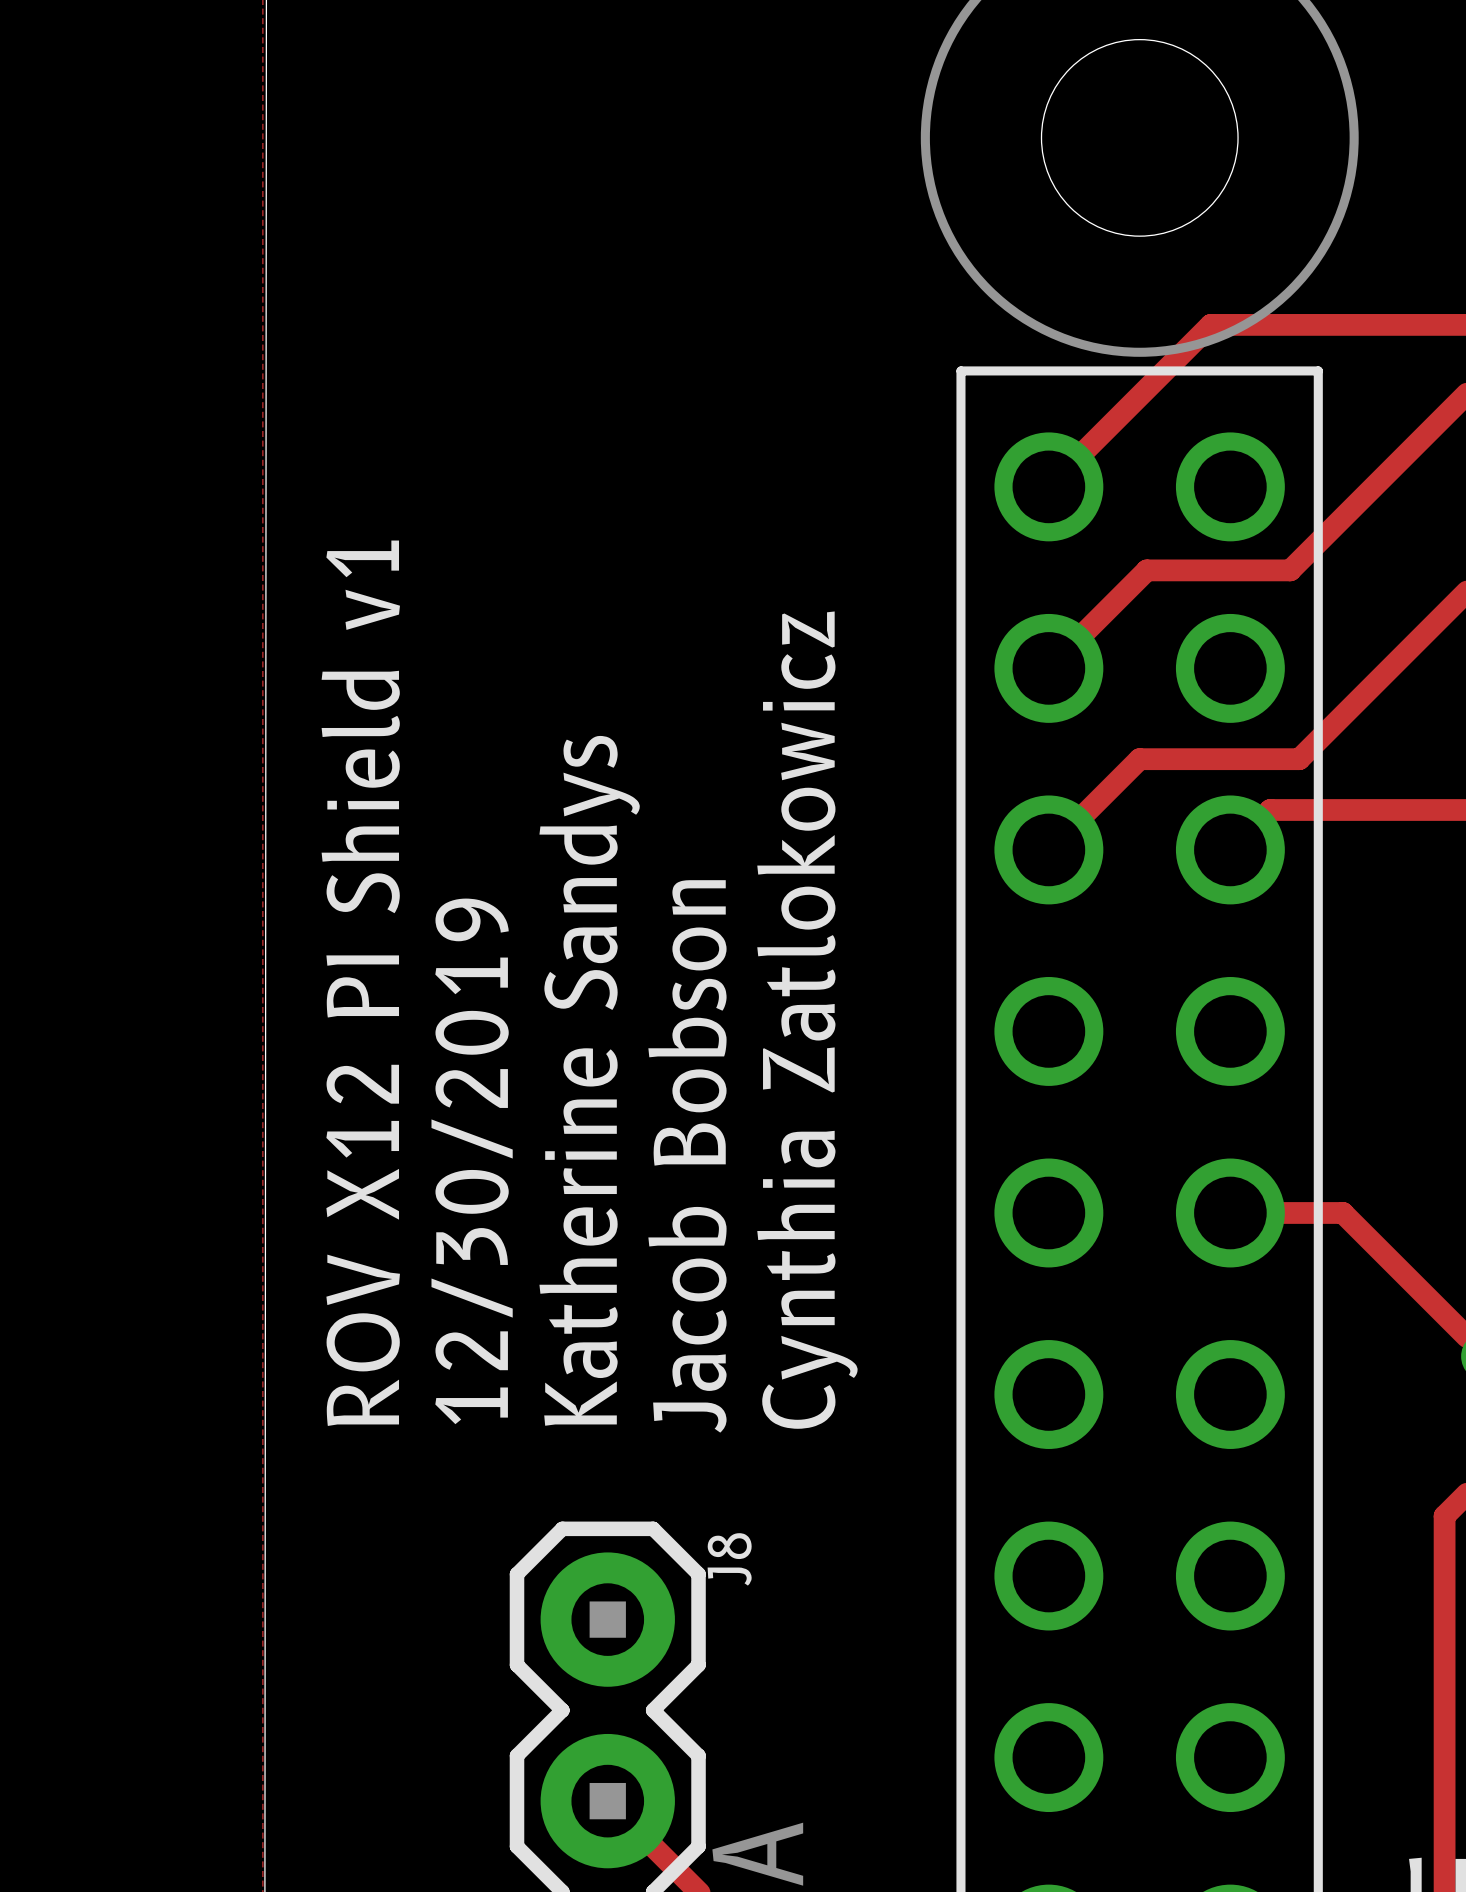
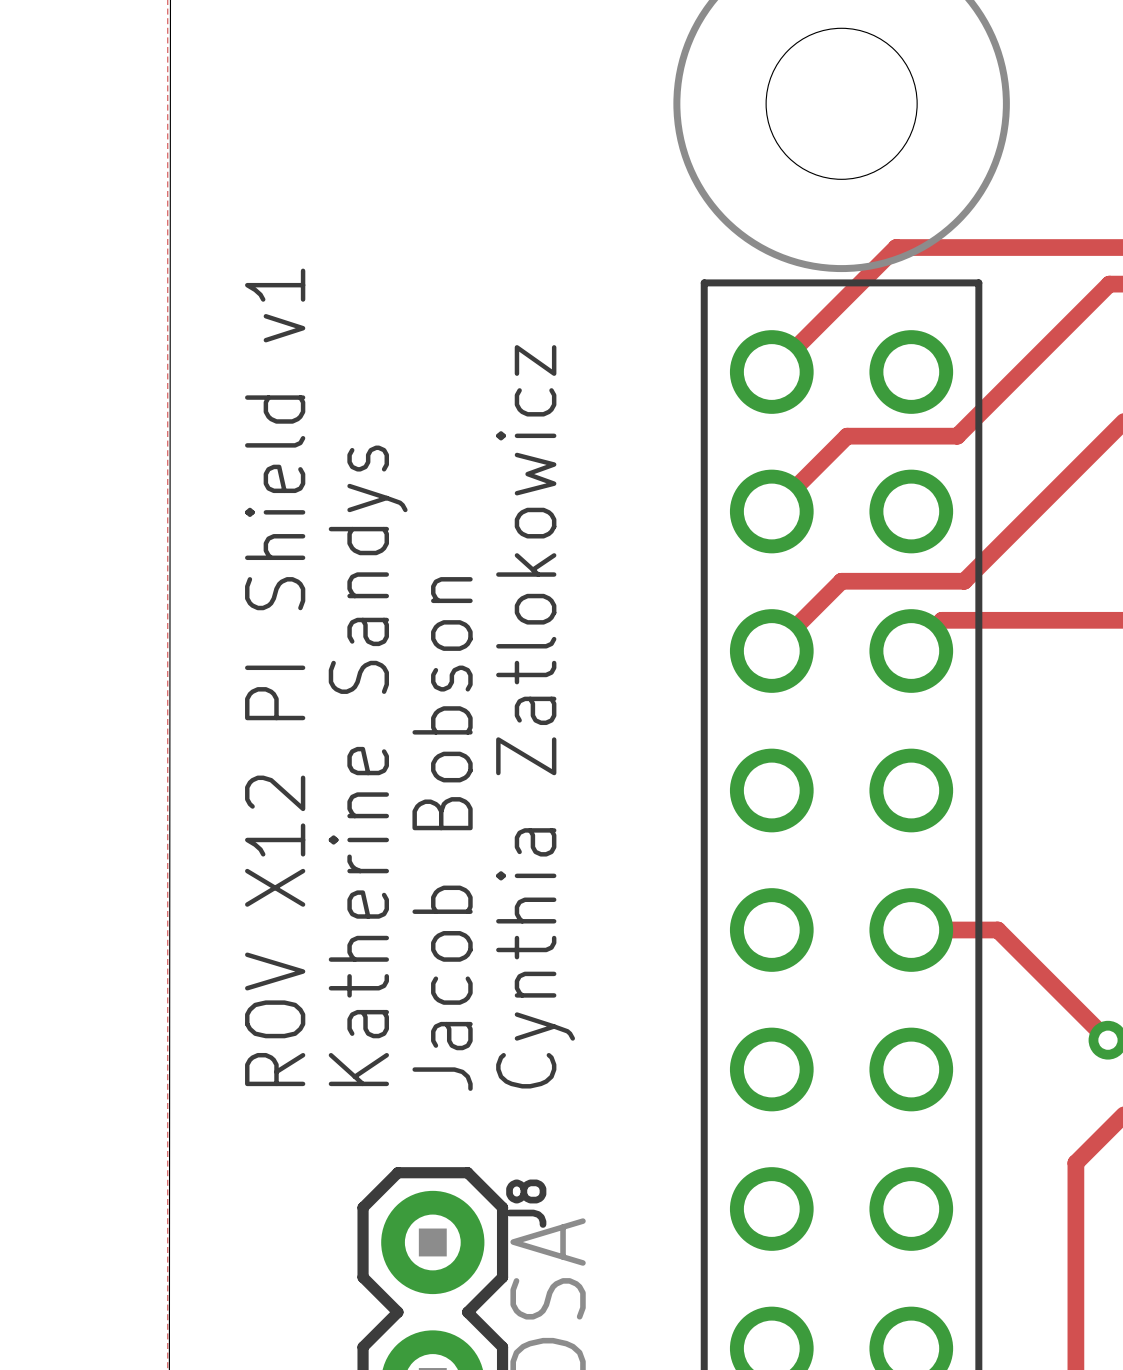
text position: ROV X12 PI Shield v1 (360, 983) -> ROV X12 PI Shield v1 (275, 677)
text position: Cynthia Zatlokowicz (807, 1020) -> Cynthia Zatlokowicz (535, 716)
text position: Katherine Sandys (589, 1080) -> Katherine Sandys (368, 765)
text position: Jacob Bobson (687, 1156) -> Jacob Bobson (442, 834)
text: 12/30/2019 (472, 1161) -> none

